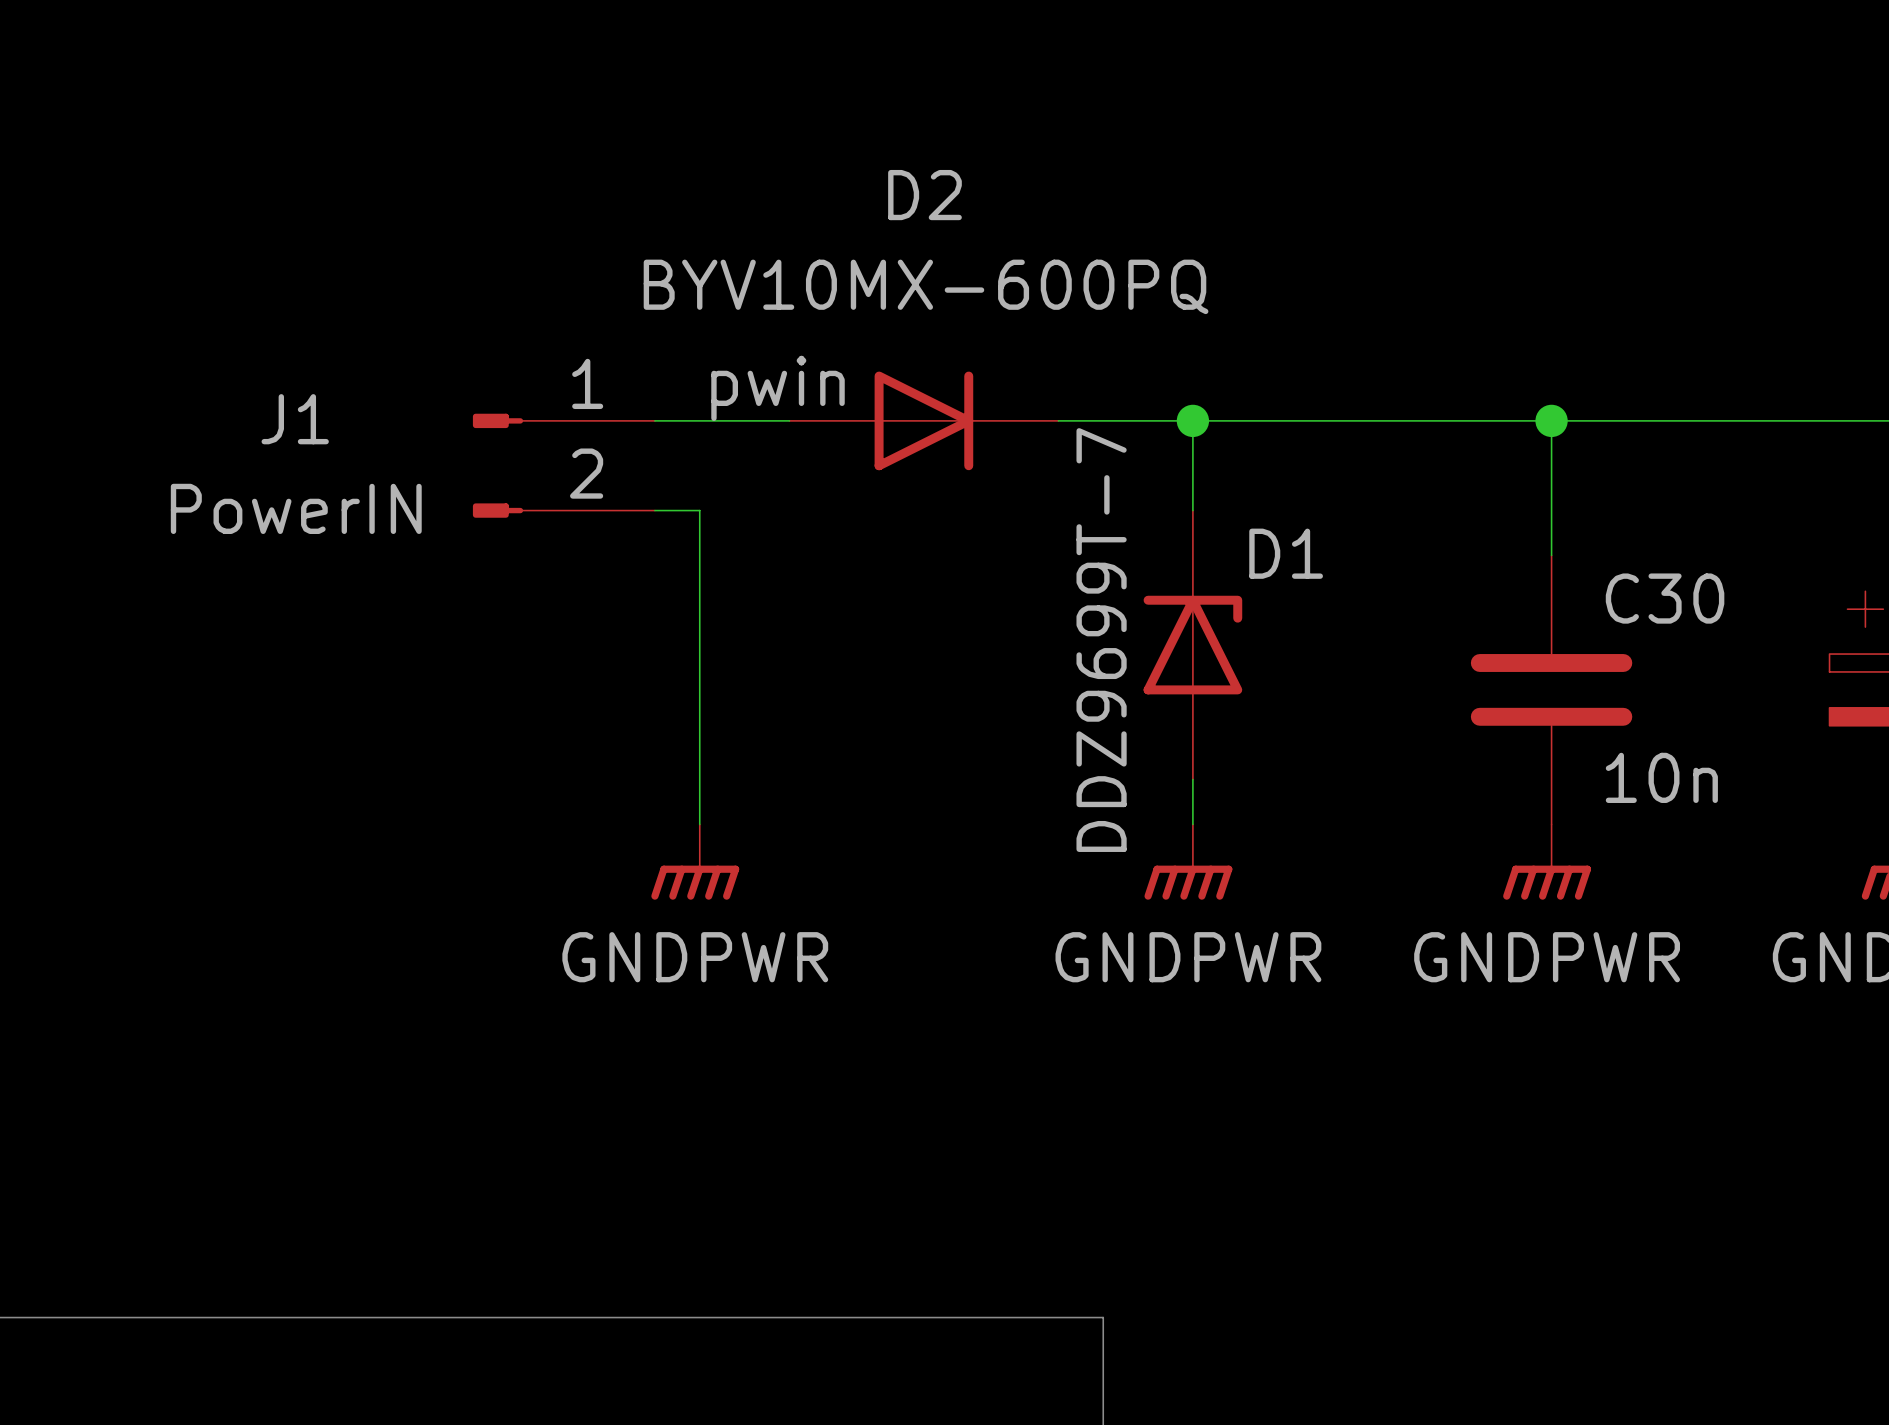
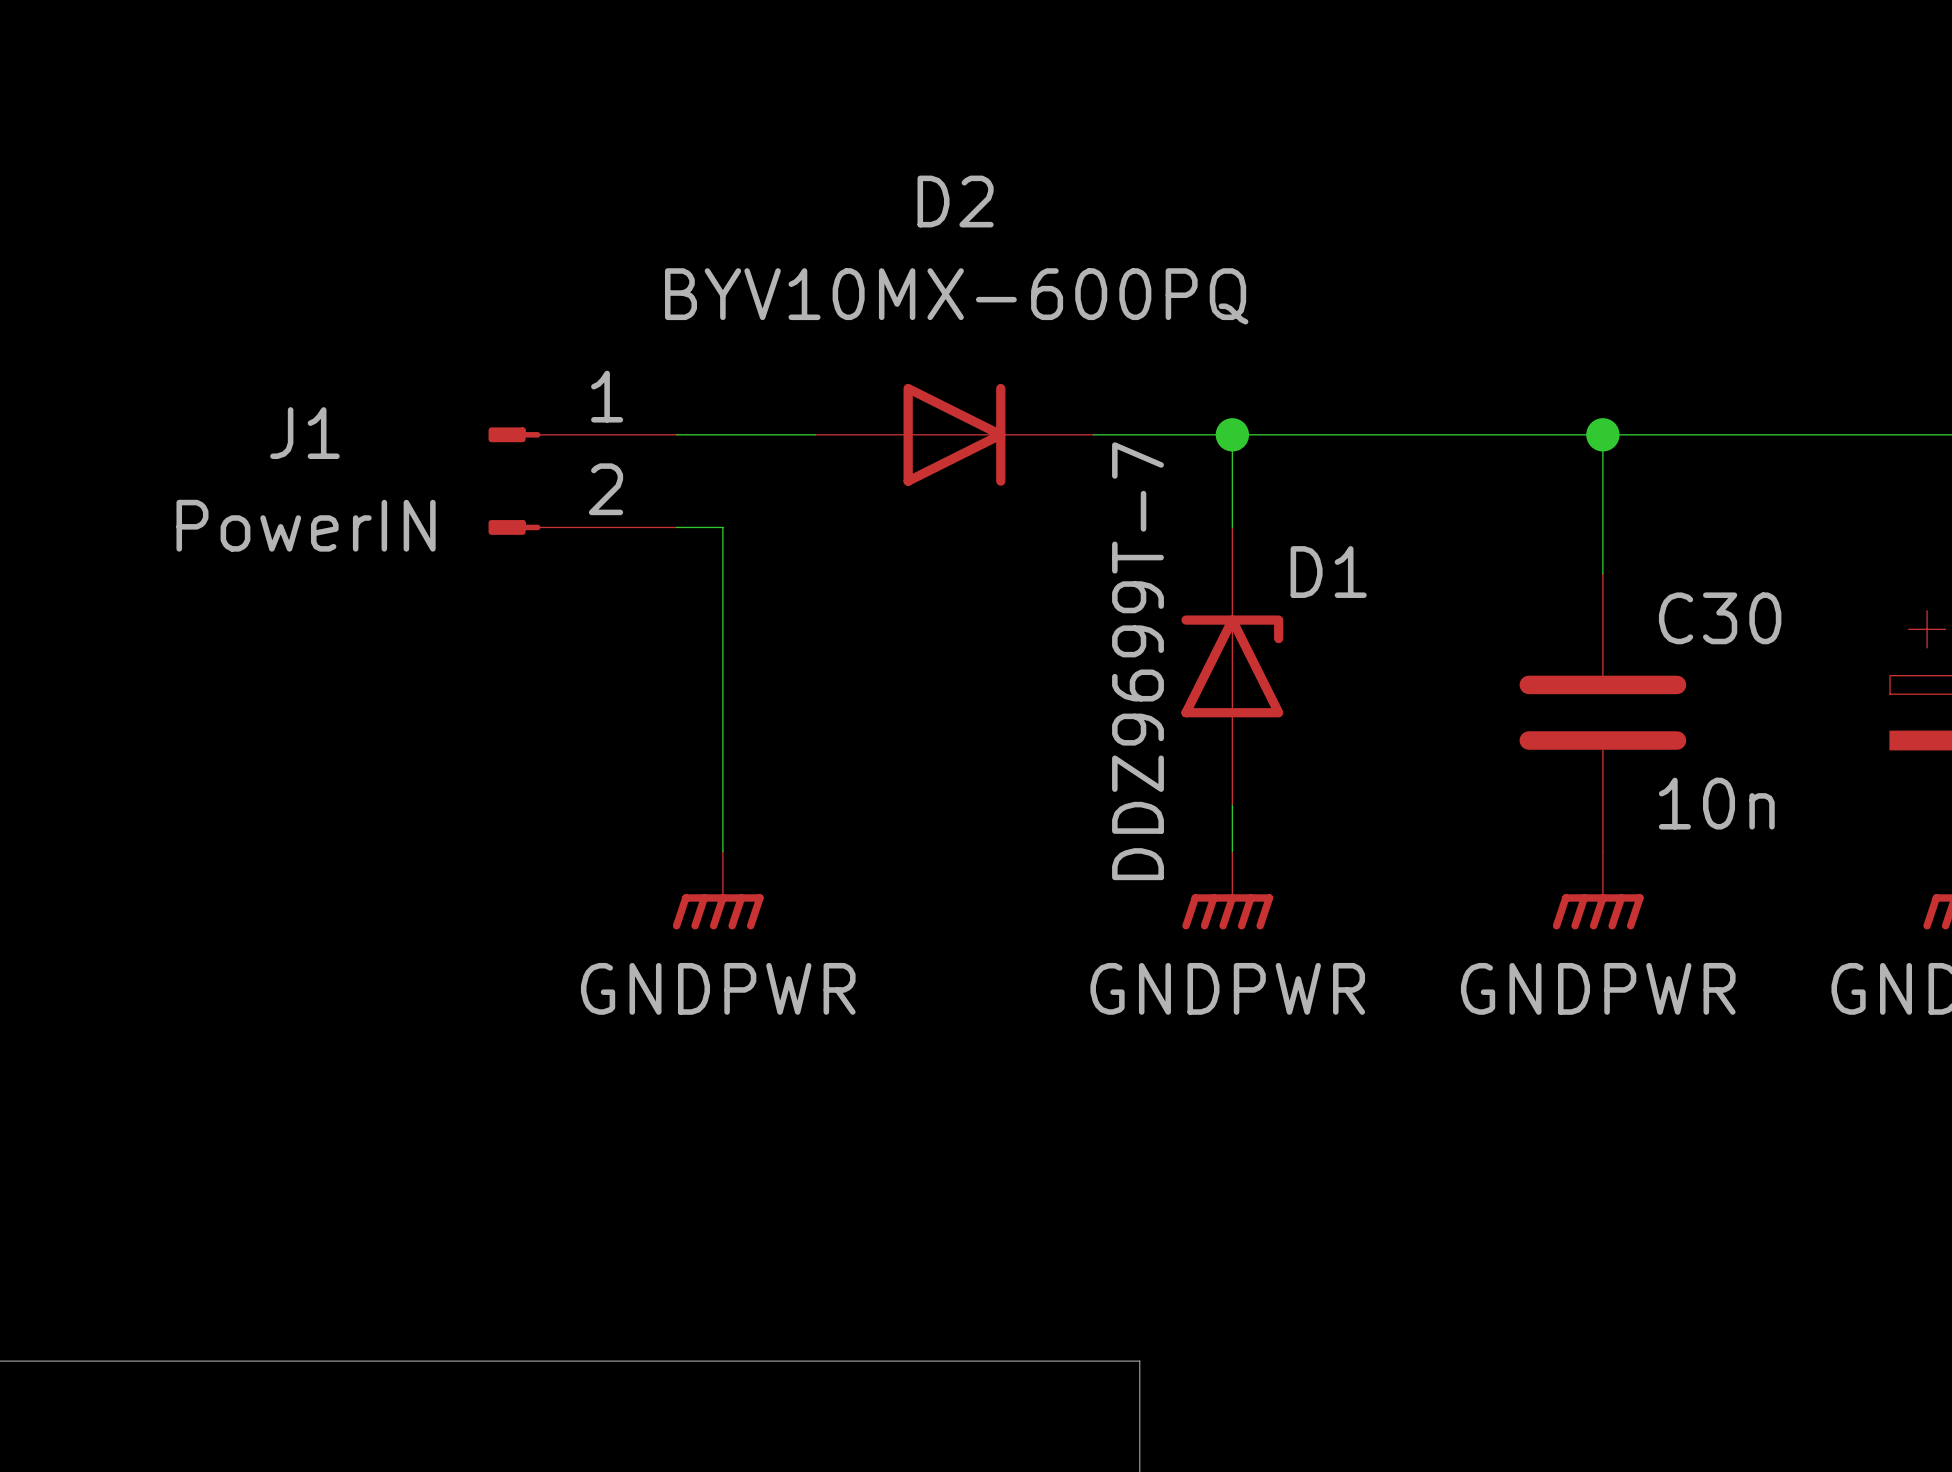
label: pwin (778, 388) -> none

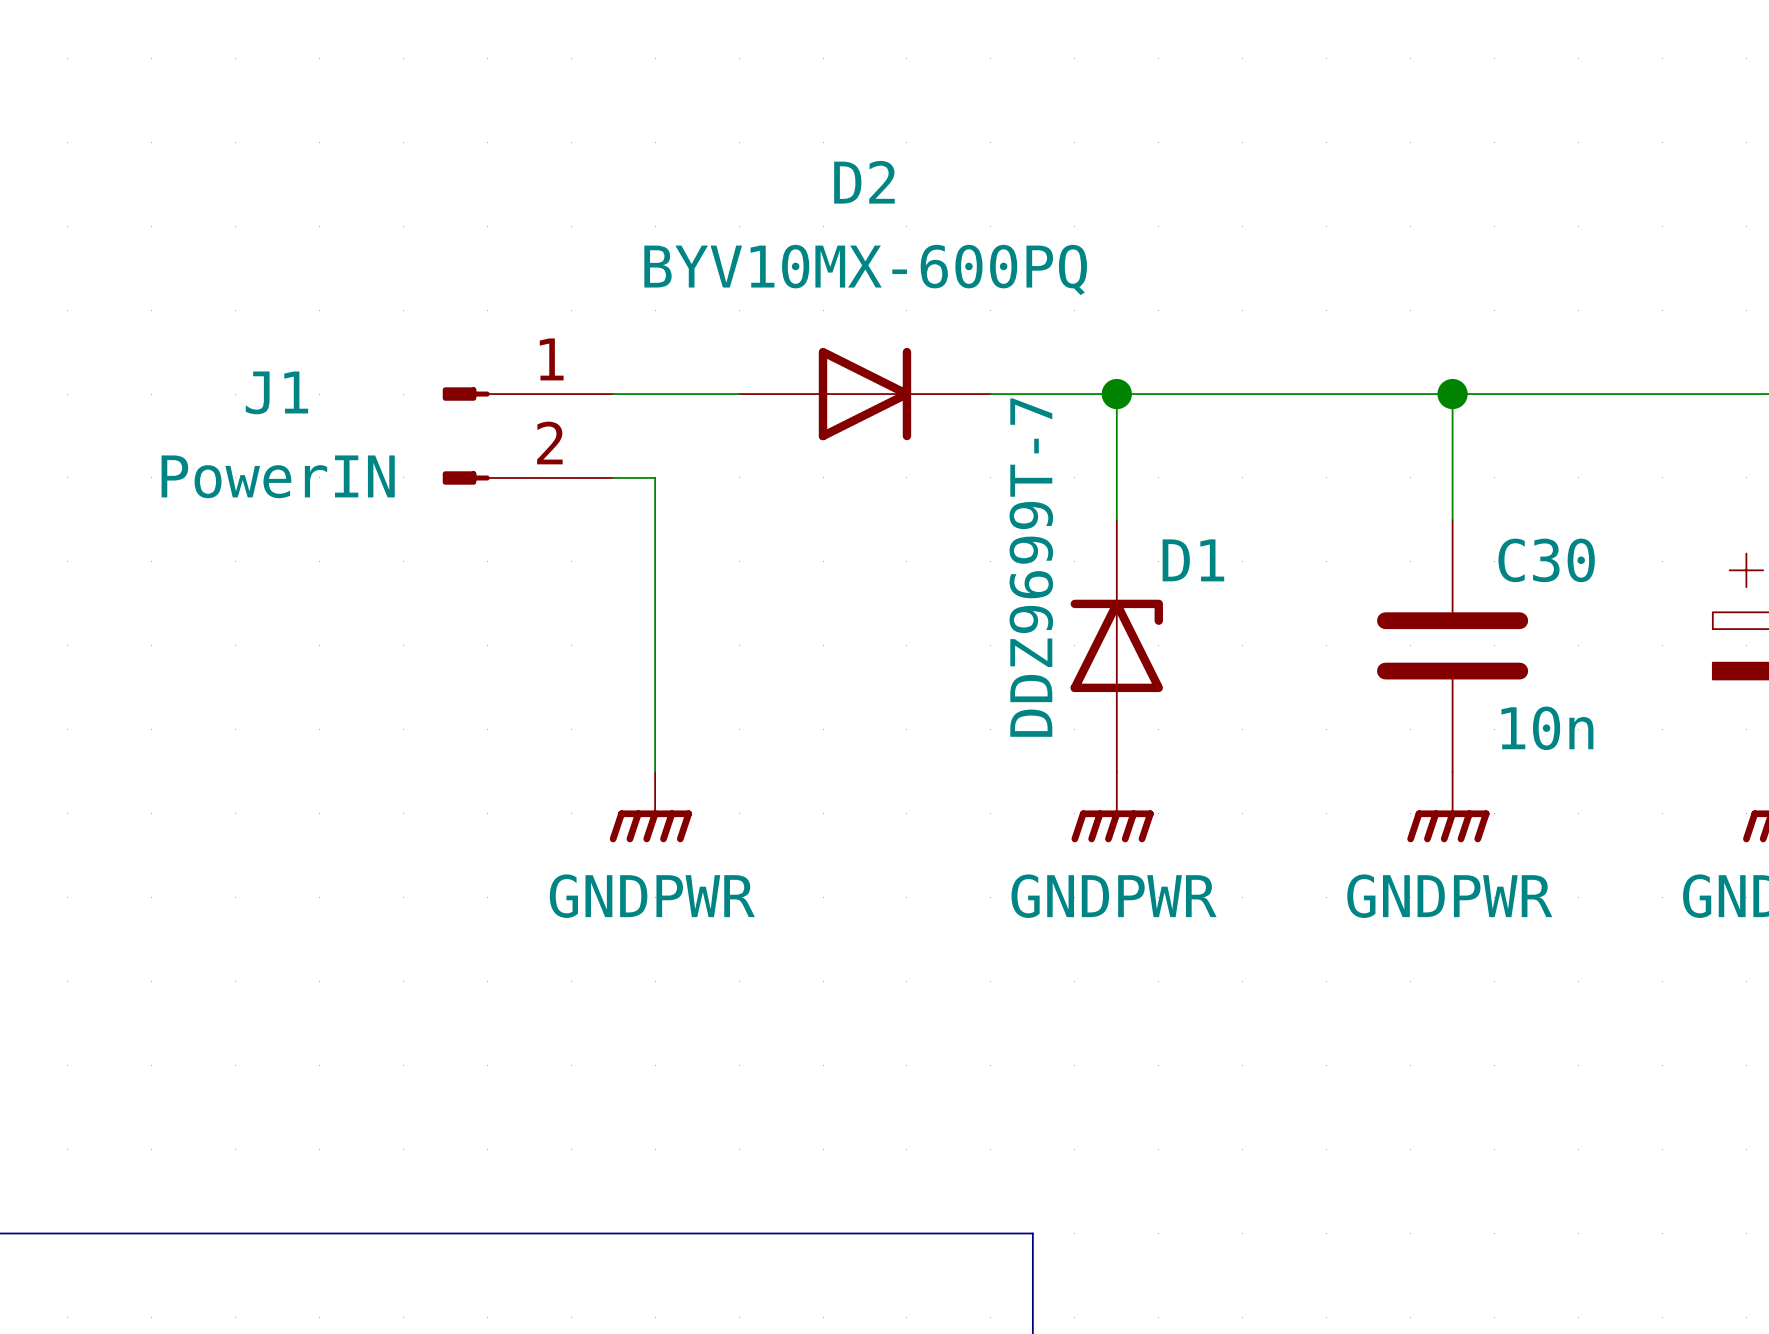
D1 position: (1232, 666) -> (1116, 645)

